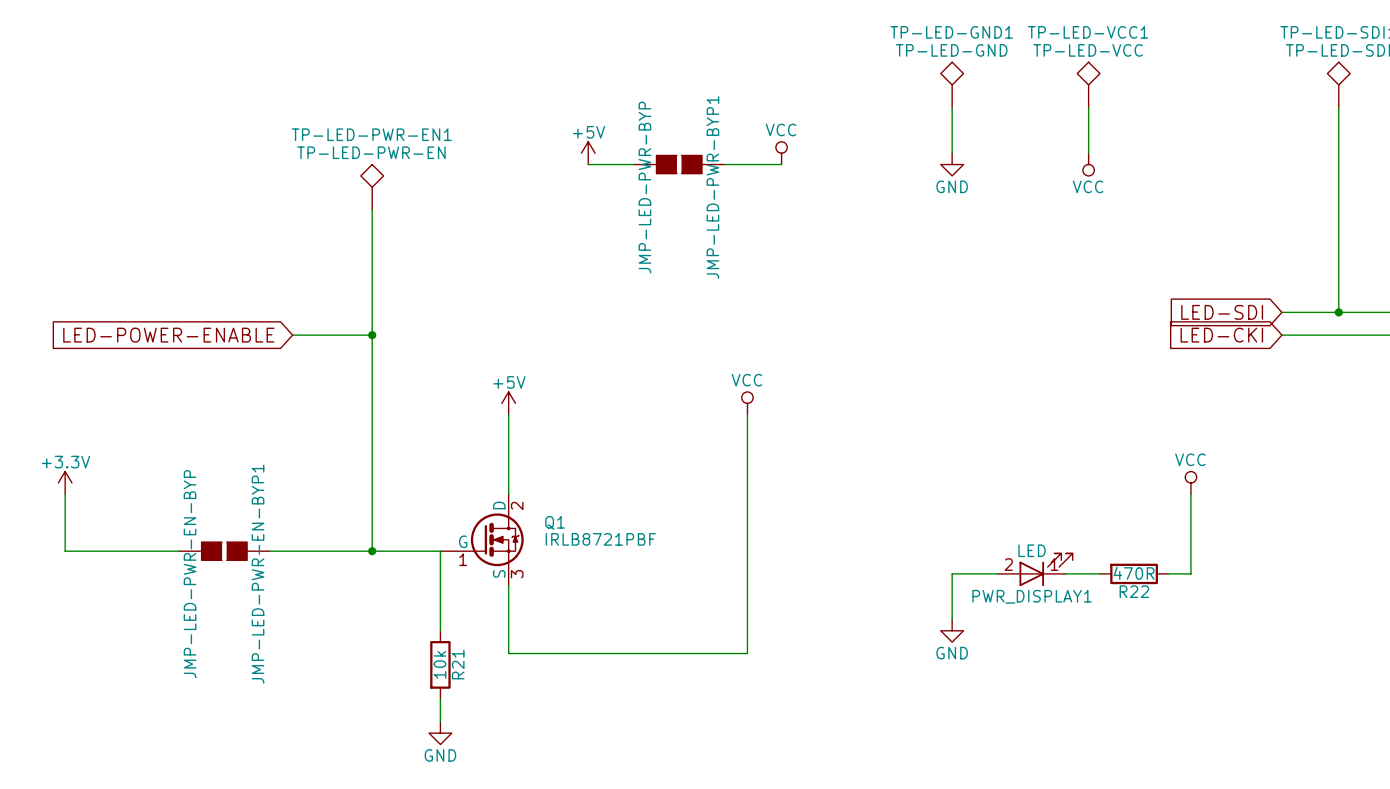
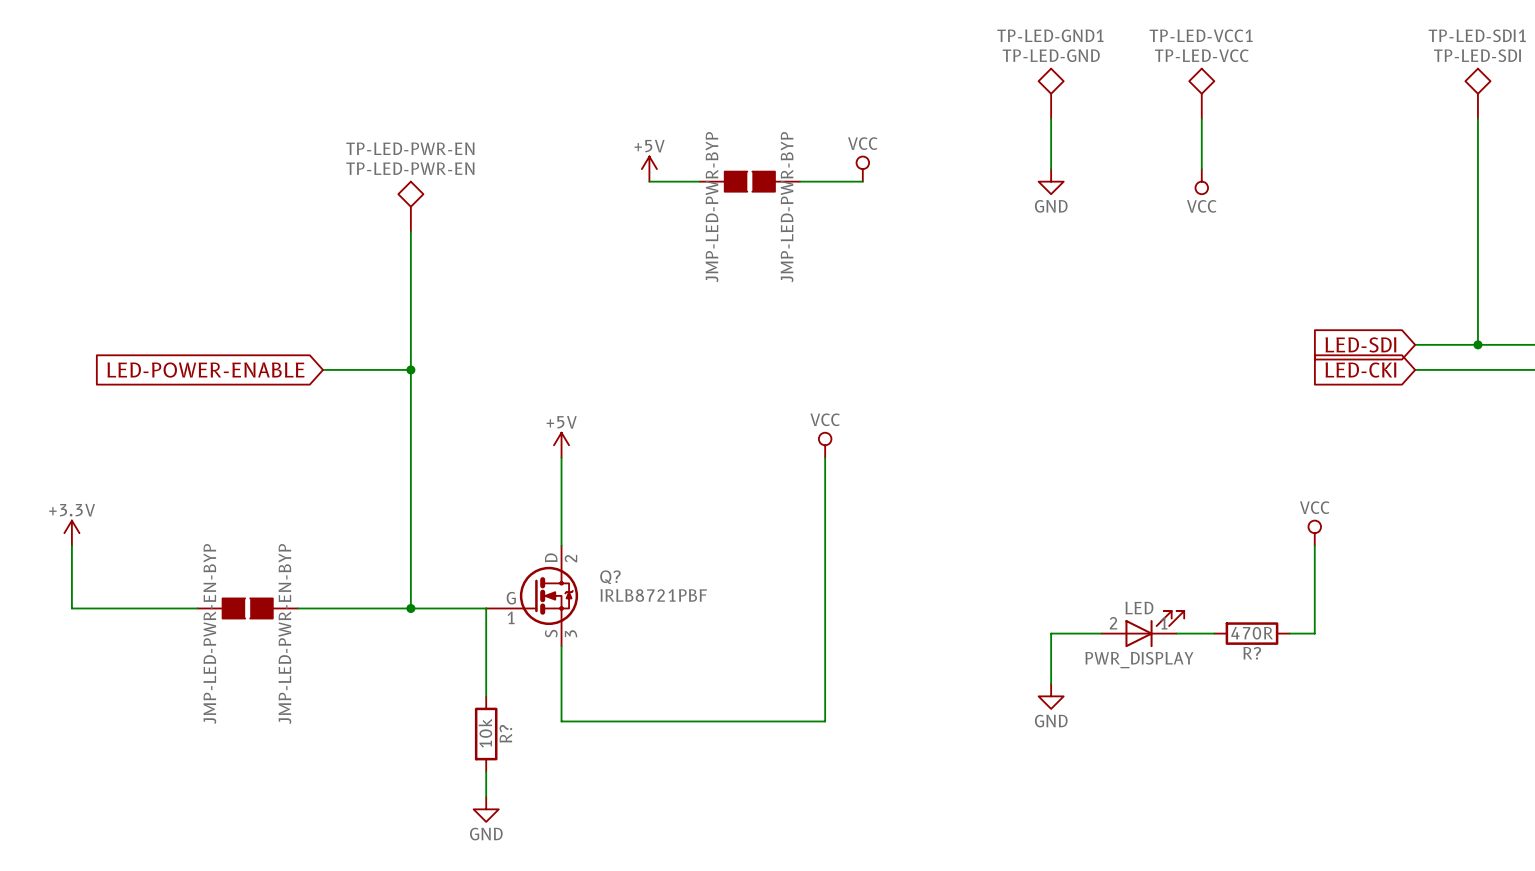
TP-LED-PWR-EN1 name: TP-LED-PWR-EN1 (371, 134) -> TP-LED-PWR-EN (410, 148)
JMP-LED-PWR-BYP1 name: JMP-LED-PWR-BYP1 (712, 187) -> JMP-LED-PWR-BYP (787, 207)
Q1 name: Q1 (555, 522) -> Q? (610, 577)
JMP-LED-PWR-EN-BYP1 name: JMP-LED-PWR-EN-BYP1 (258, 574) -> JMP-LED-PWR-EN-BYP (284, 634)
R22 name: R22 (1134, 591) -> R? (1252, 653)
PWR_DISPLAY1 name: PWR_DISPLAY1 (1032, 596) -> PWR_DISPLAY (1139, 660)
R21 name: R21 (458, 664) -> R? (505, 733)

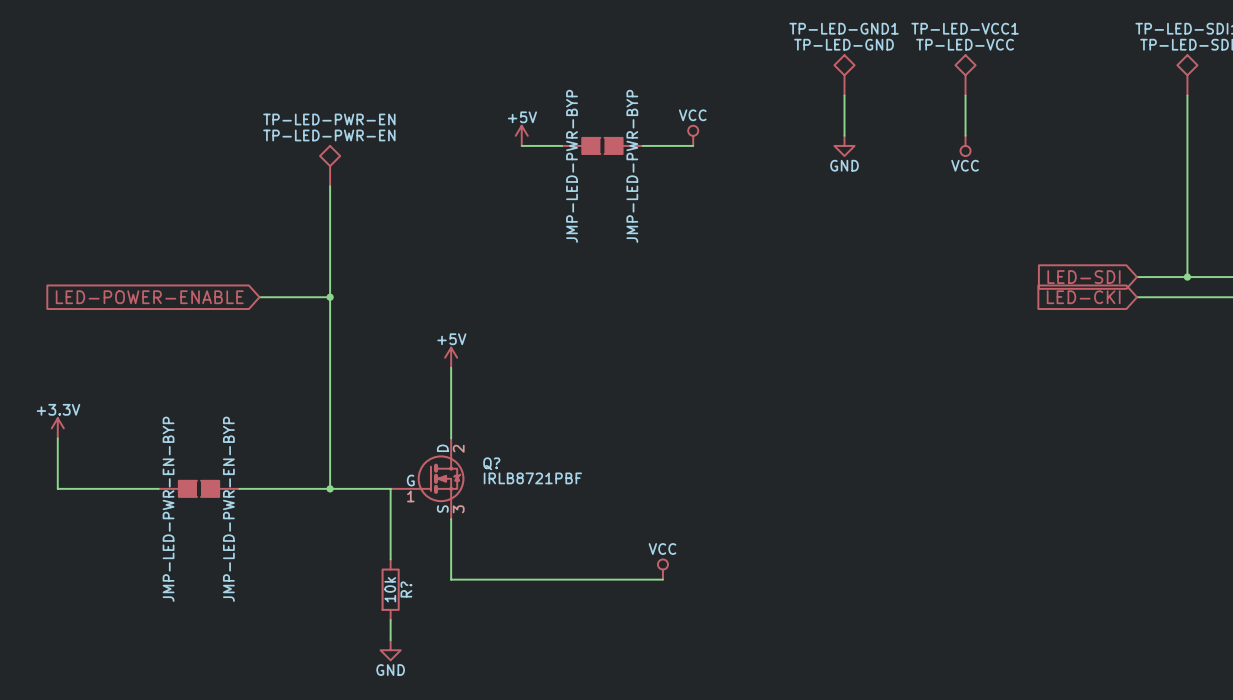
power symbol: VCC (825, 445) -> none
wire: (825, 457) (825, 721) -> none
power symbol: VCC (1314, 533) -> none
wire: (1314, 545) (1314, 633) (1289, 633) -> none
PWR_DISPLAY: LED (1142, 629) -> none
wire: (1101, 633) (1051, 633) (1051, 683) -> none
wire: (1176, 633) (1214, 633) -> none
R?: 470R (1251, 633) -> none
power symbol: GND (1051, 696) -> none
power symbol: none -> VCC (662, 569)

